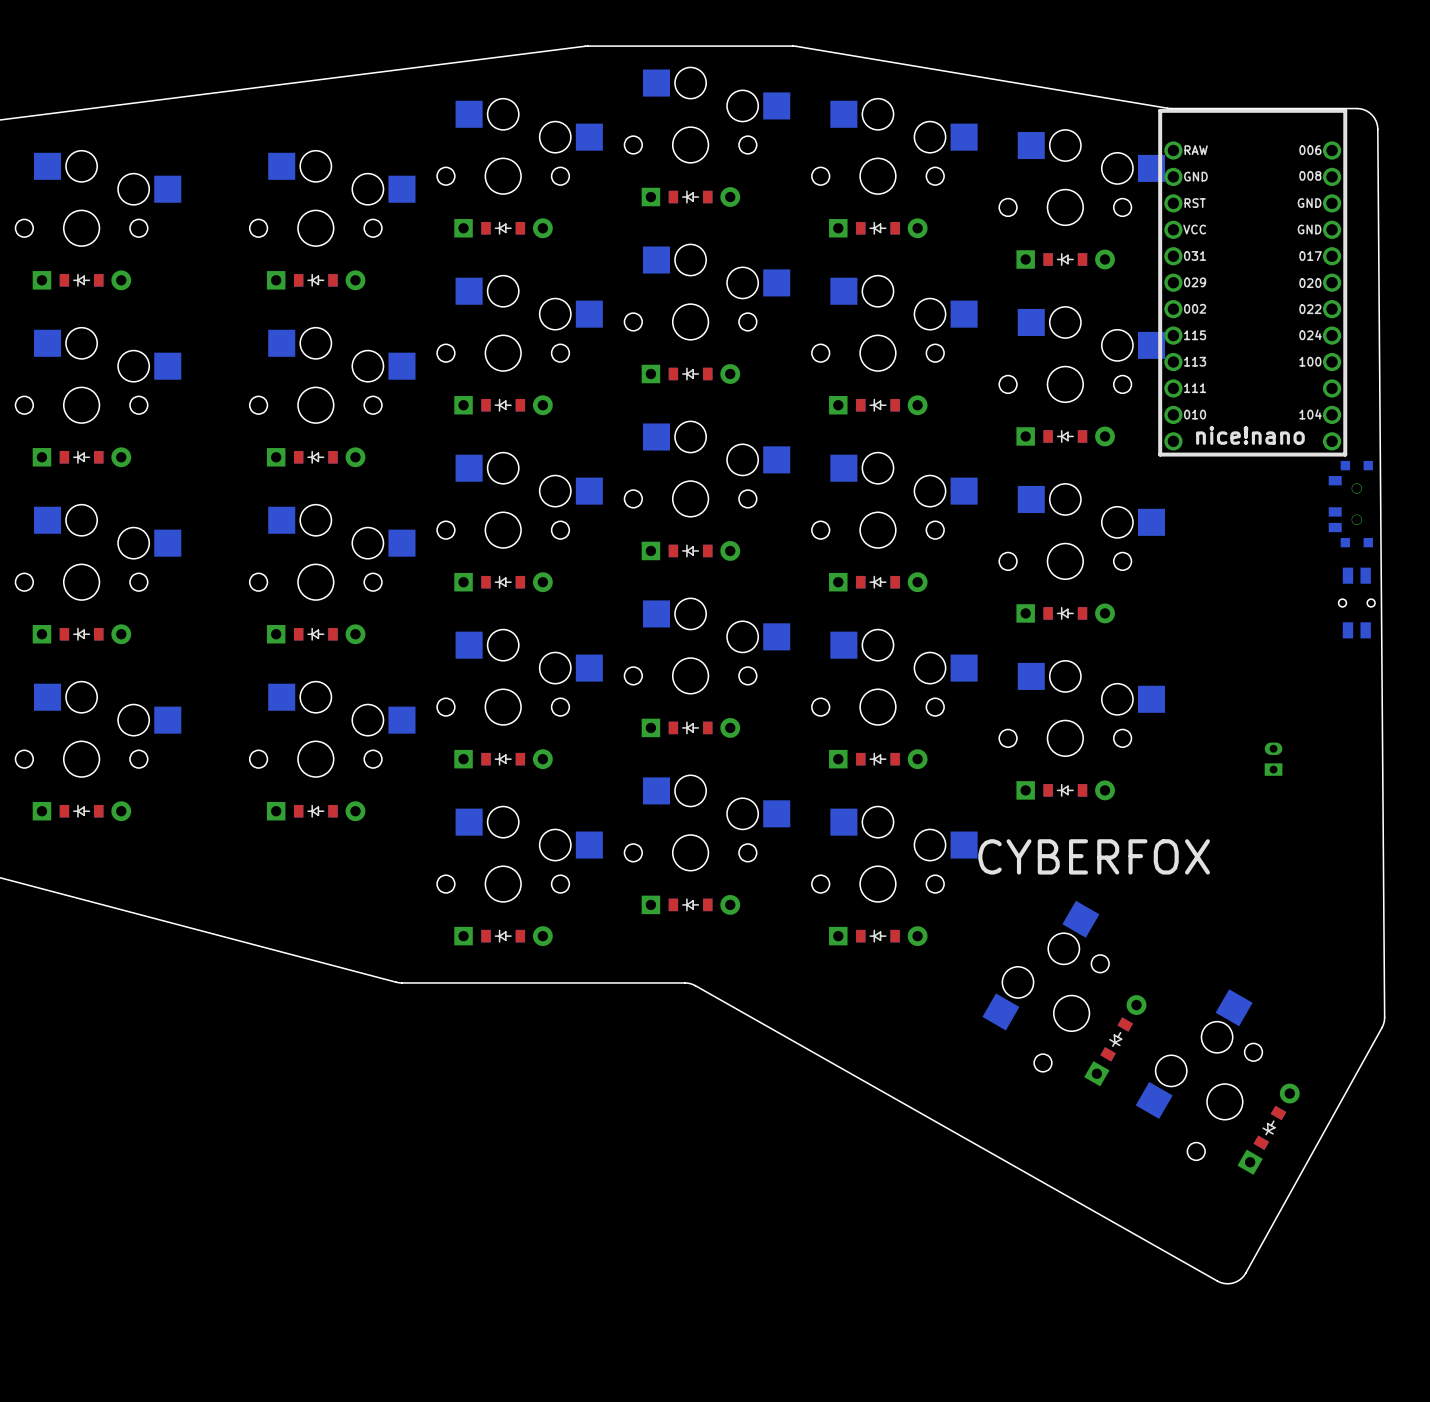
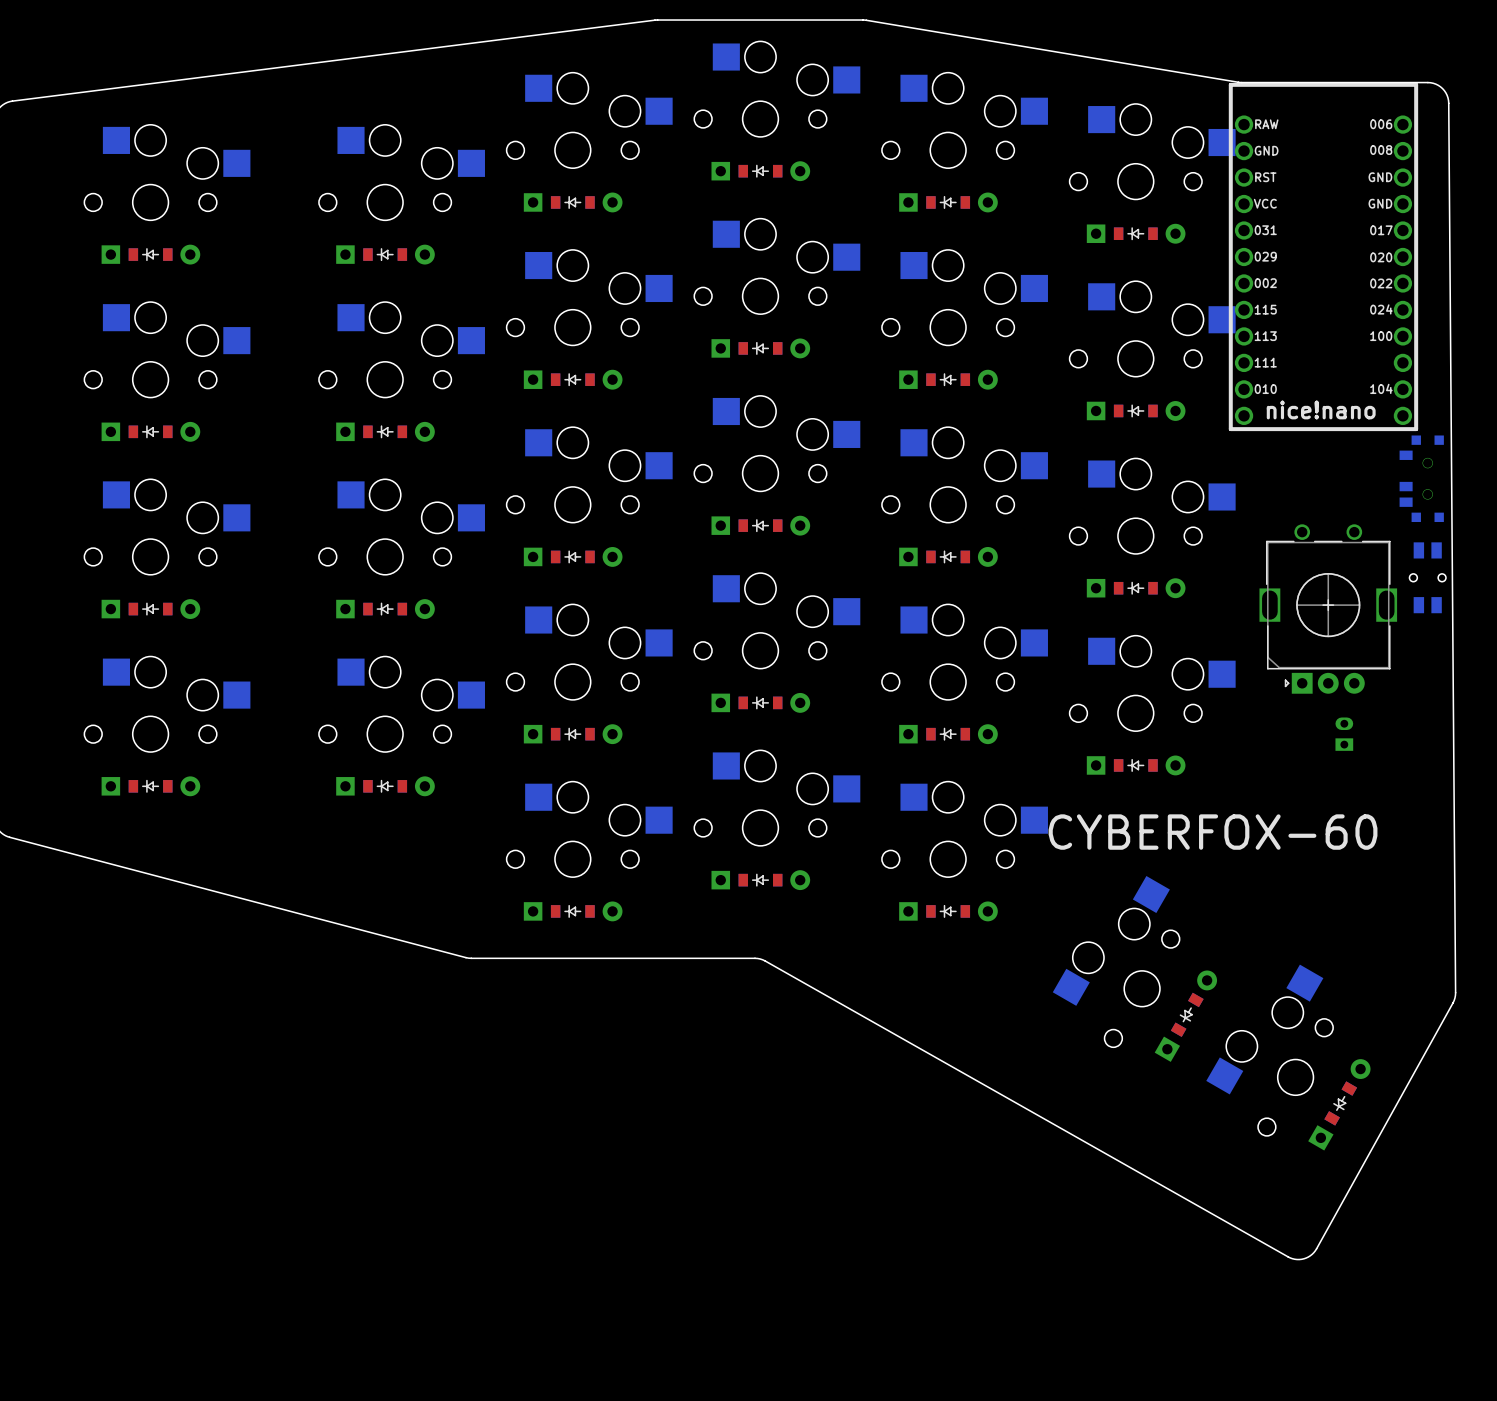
part: none -> (1328, 609)
text: CYBERFOX (1094, 856) -> CYBERFOX-60 (1213, 832)

